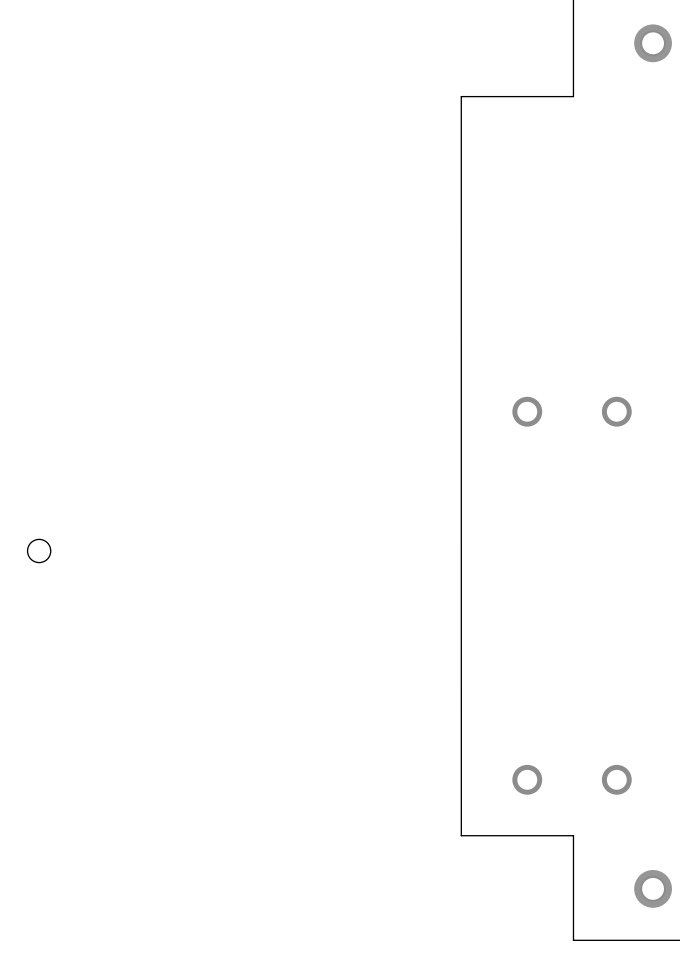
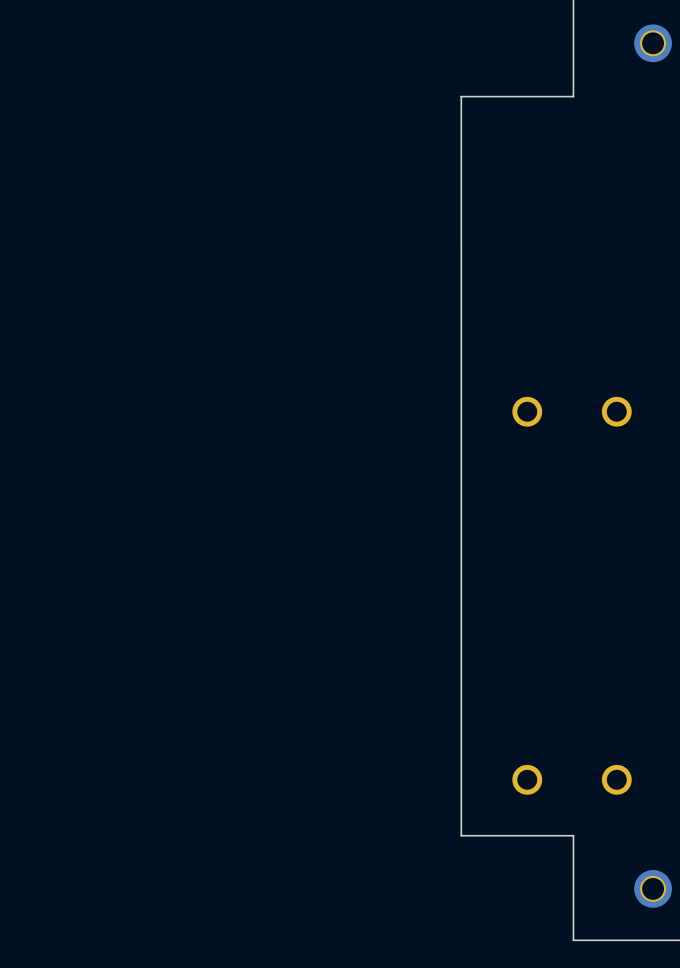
round board edge: [27, 538, 52, 564] -> none

